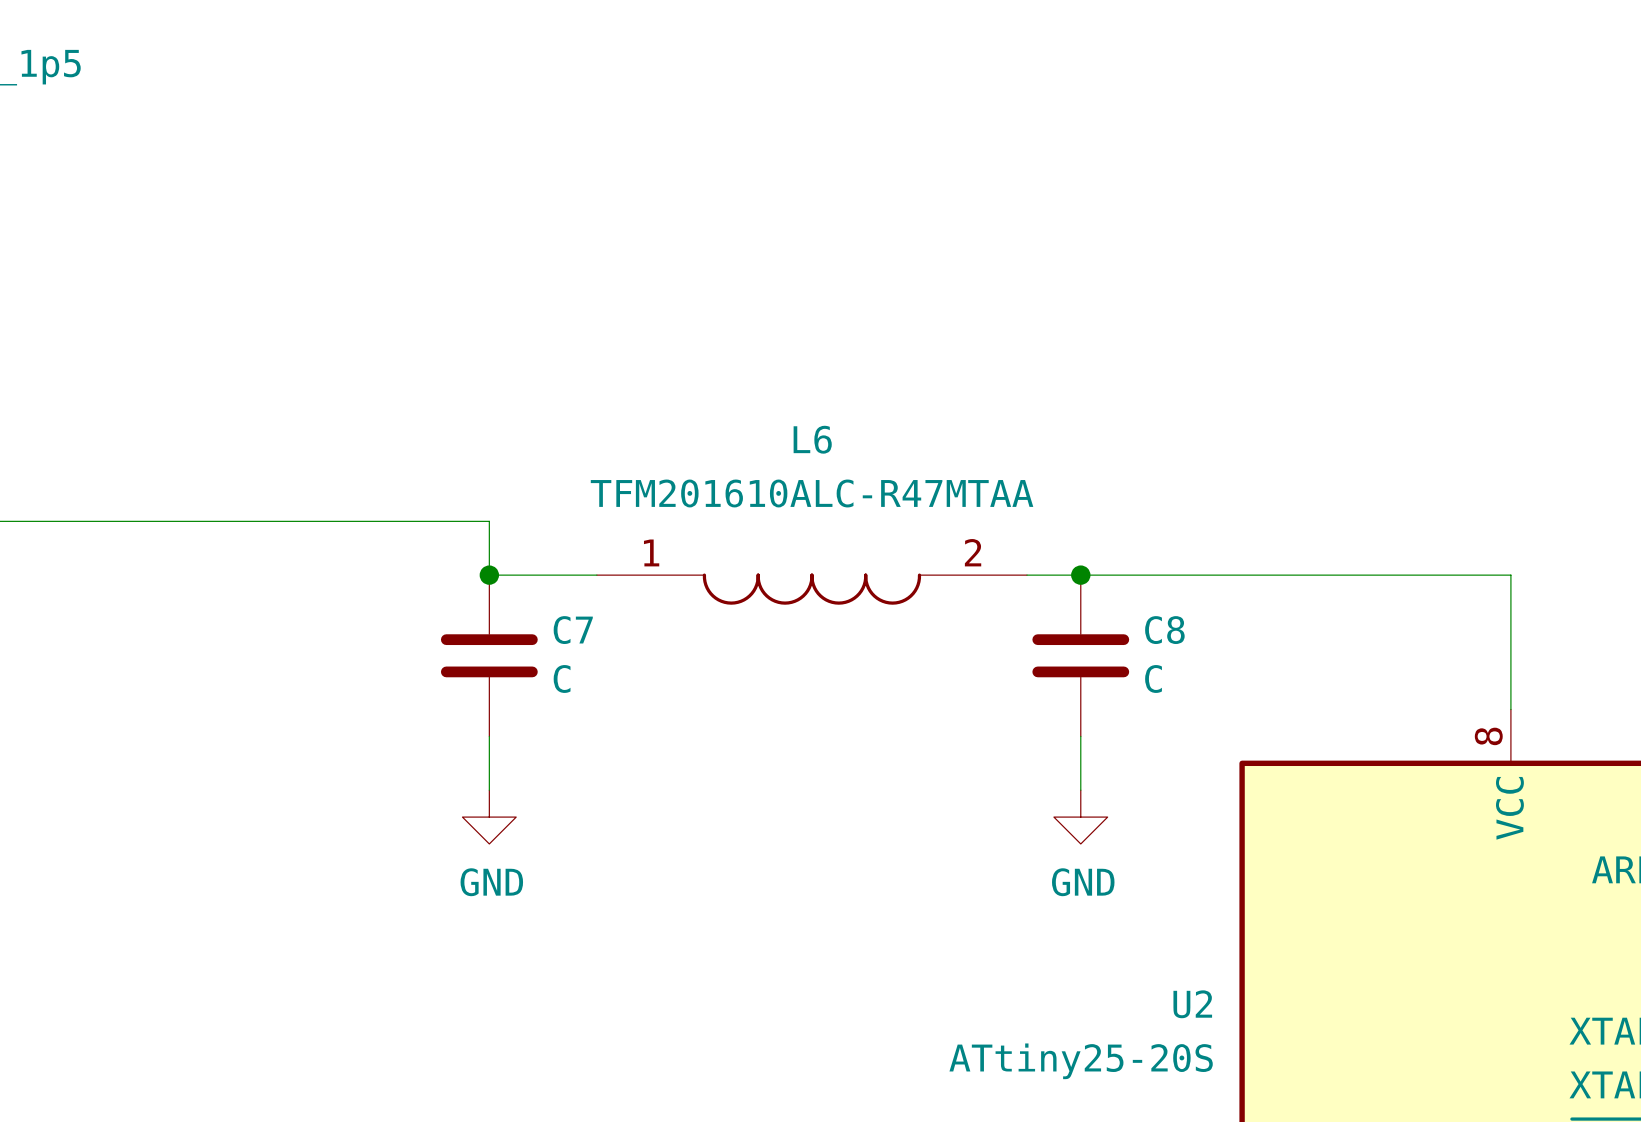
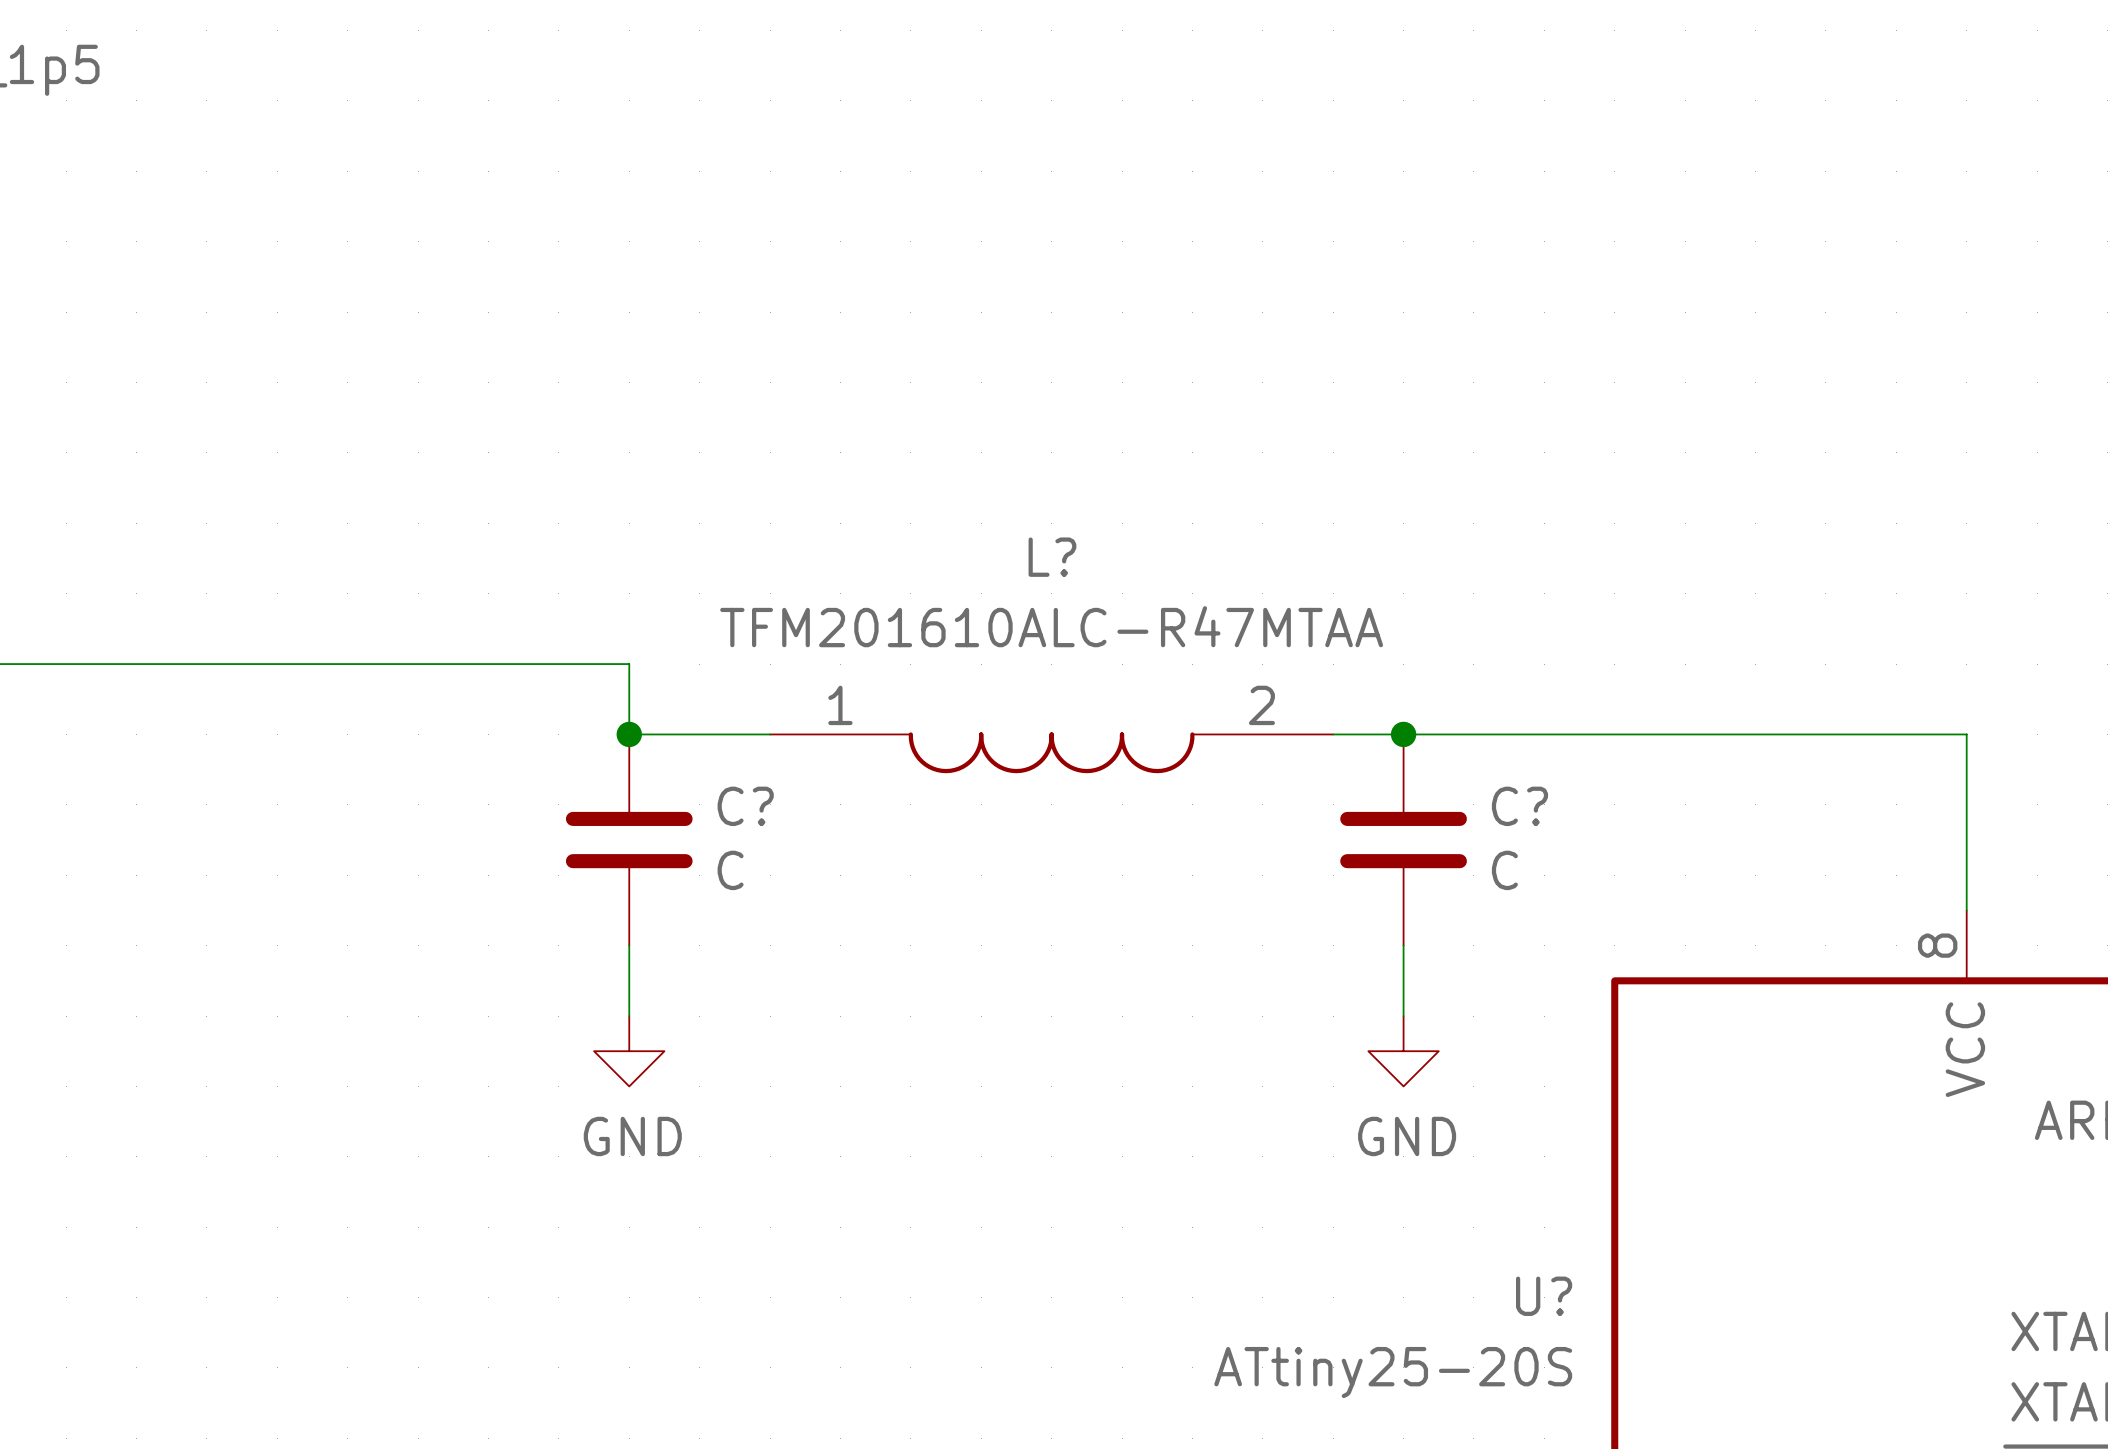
L6 name: L6 (812, 439) -> L? (1052, 557)
C7 name: C7 (573, 630) -> C? (745, 806)
C8 name: C8 (1164, 630) -> C? (1519, 806)
U2 name: U2 (1192, 1004) -> U? (1544, 1296)

